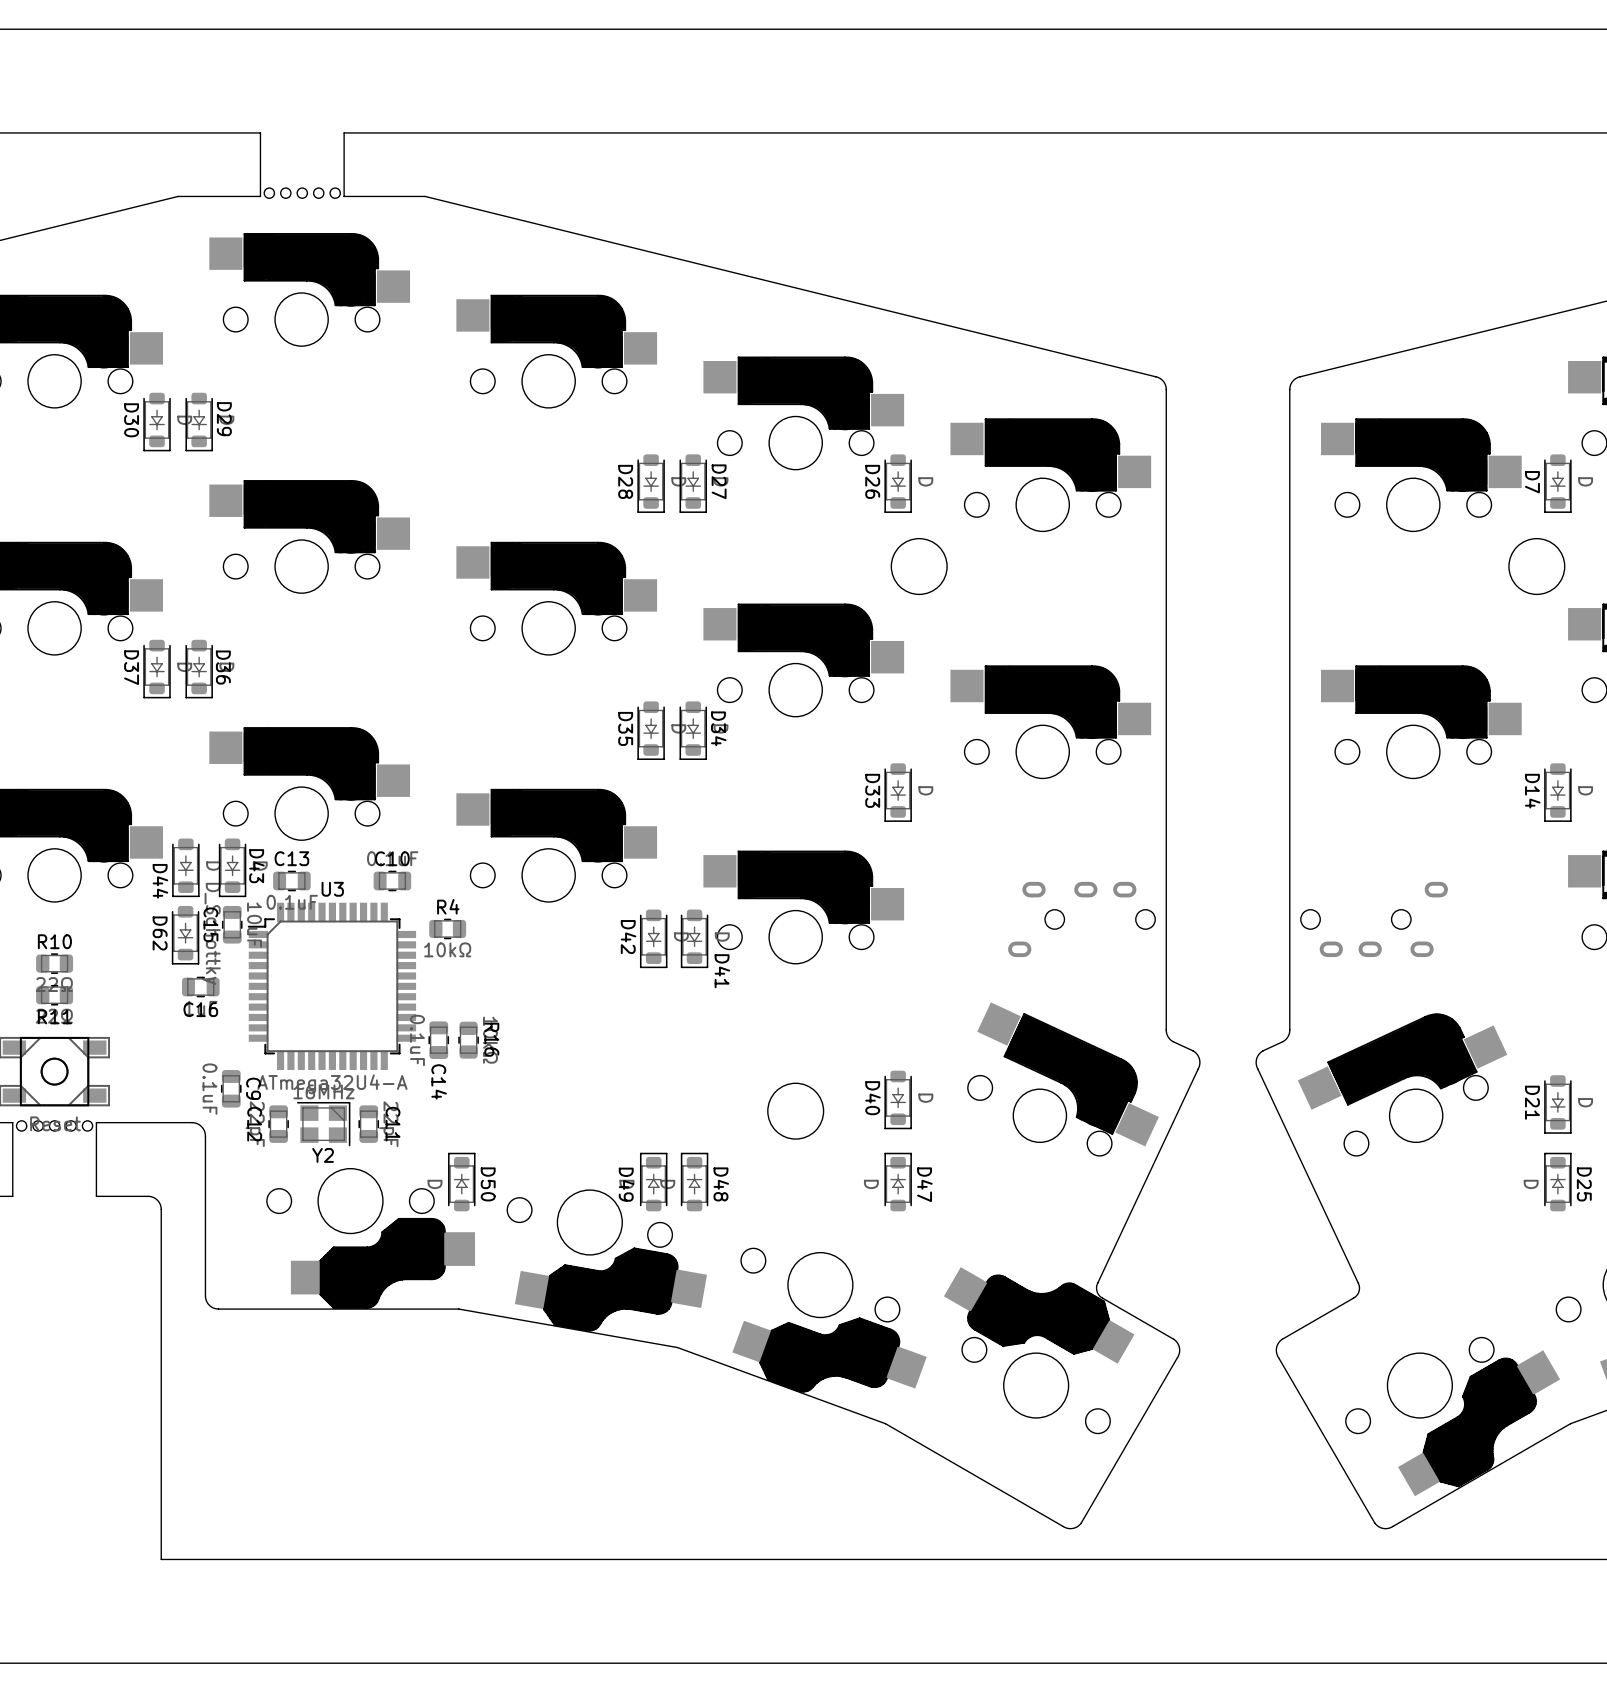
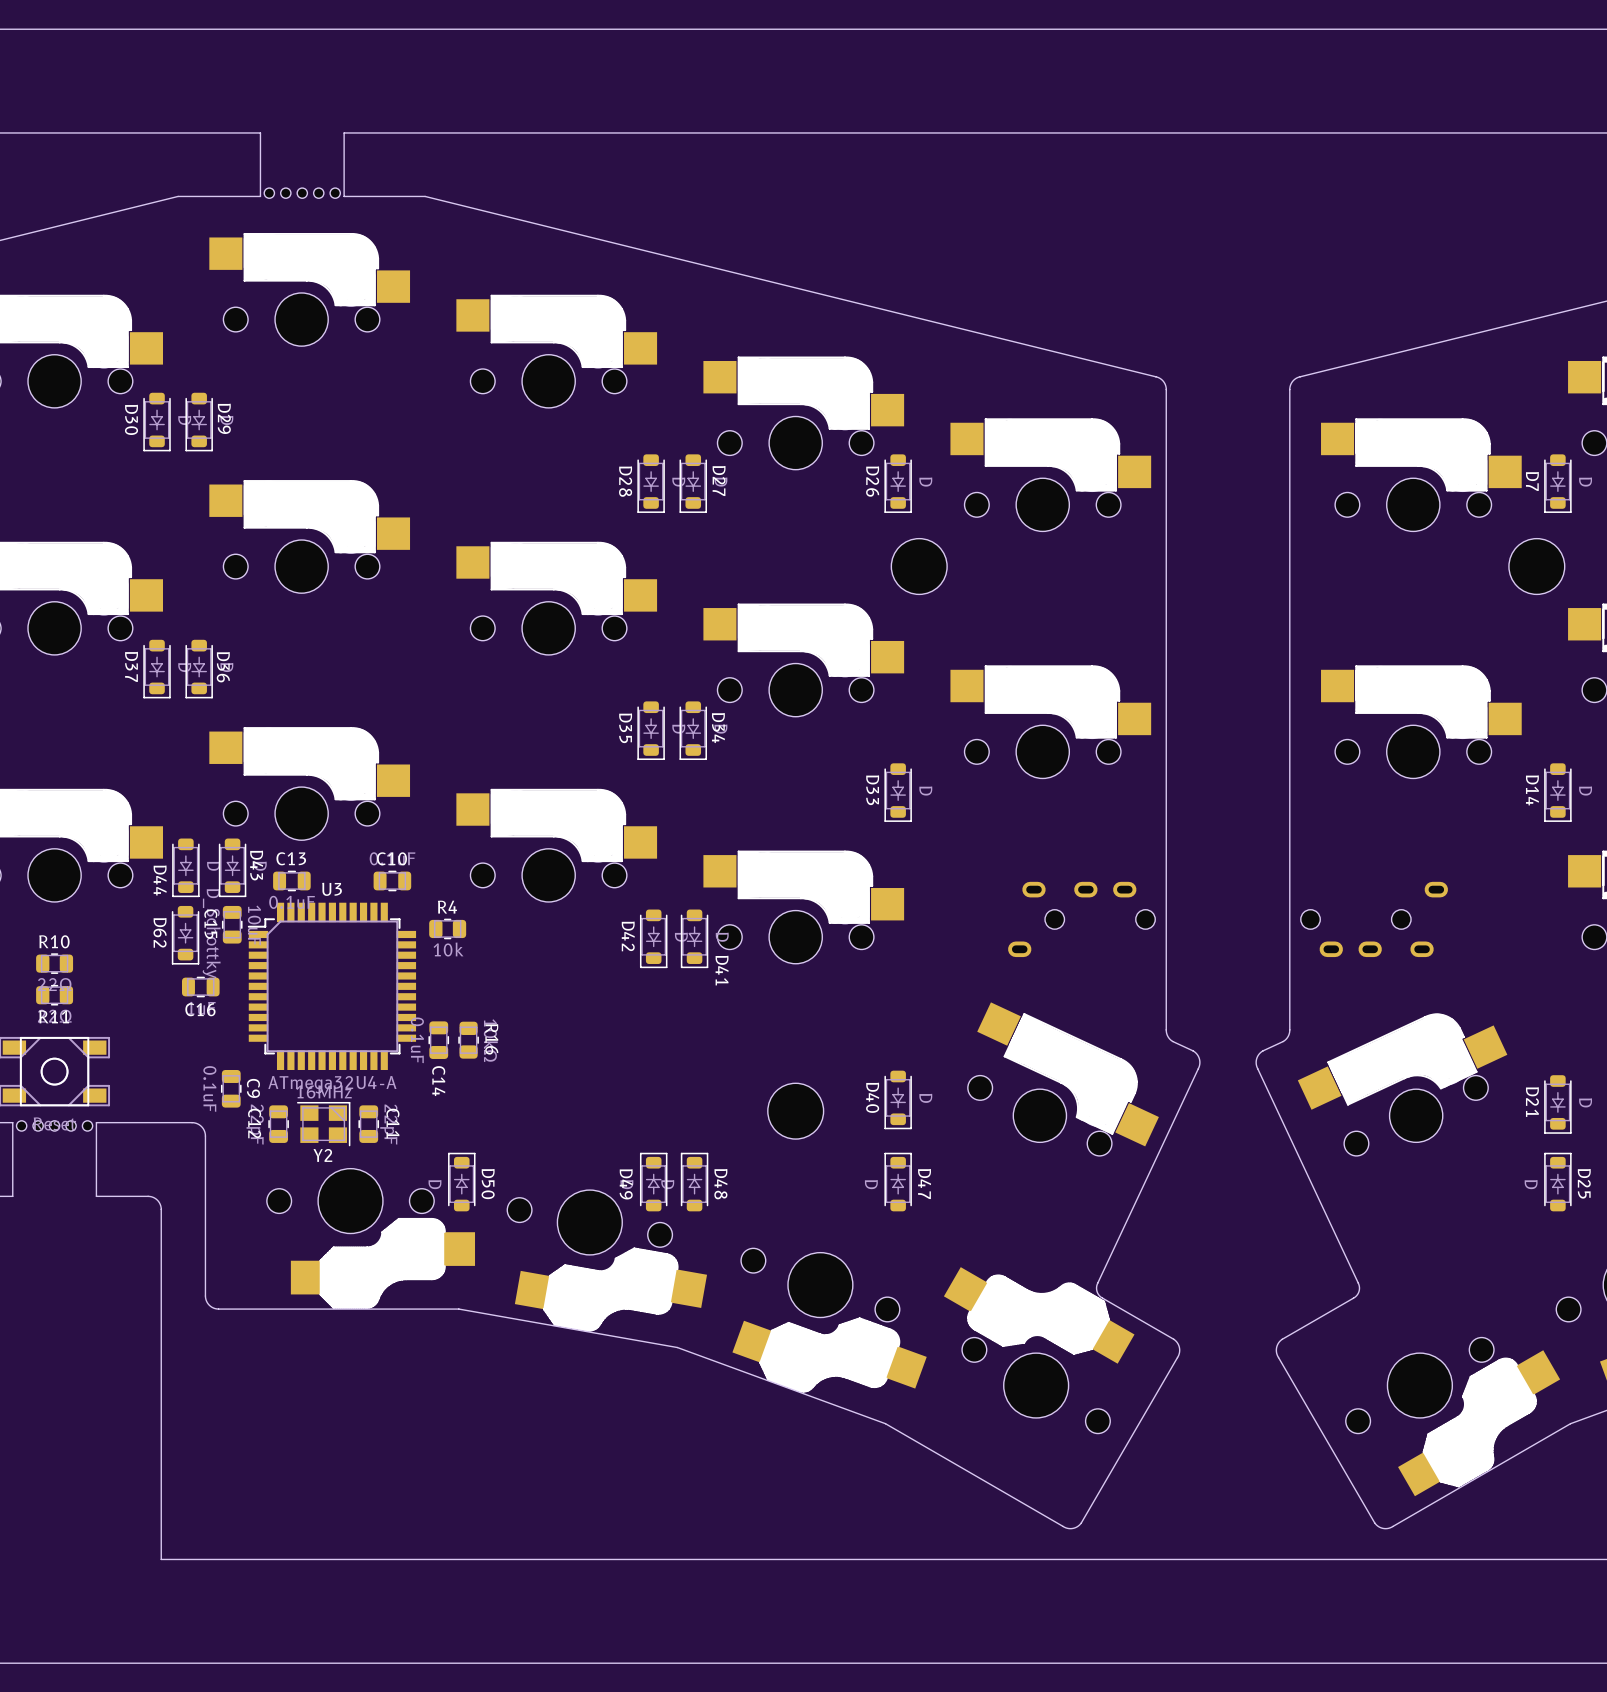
R4 value: 10kΩ (447, 949) -> 10k (448, 949)

